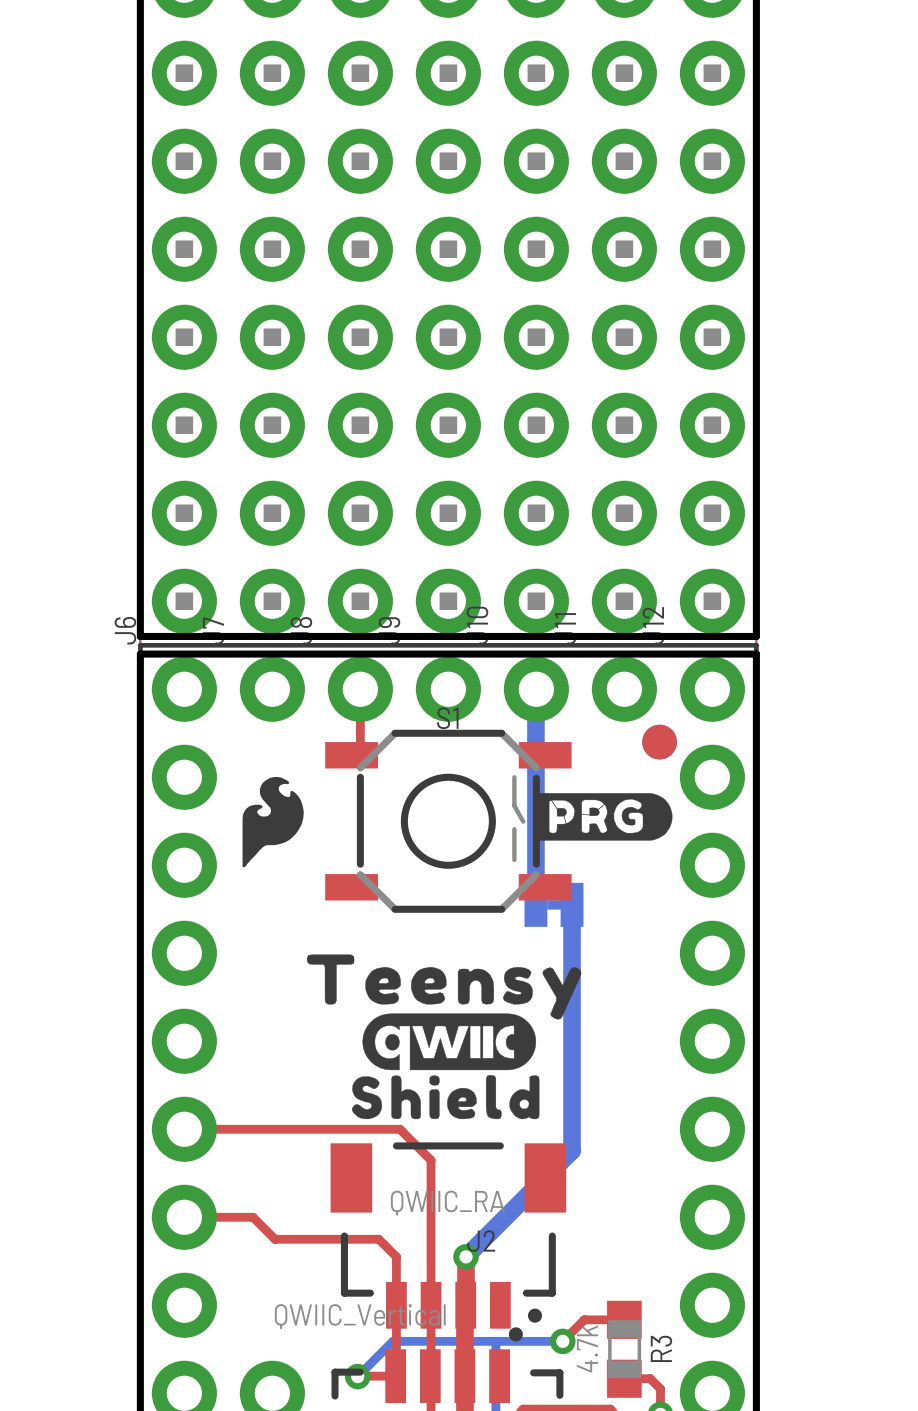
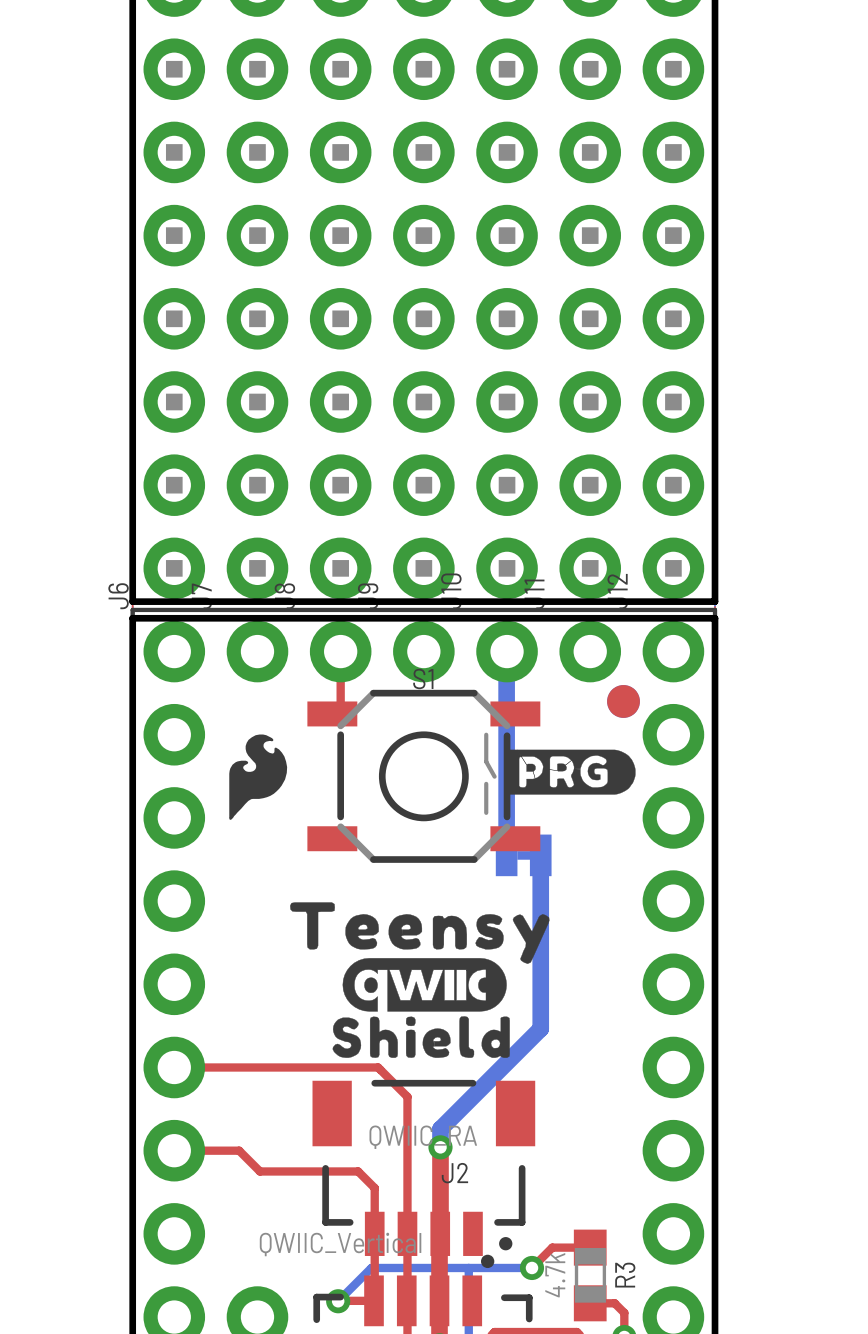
bottom track: (572, 1088) (572, 1150) (465, 1256) -> (540, 1028) (440, 1129) (440, 1147)
top track: none -> (440, 1147) (440, 1188)
via position: (465, 1256) -> (440, 1147)

